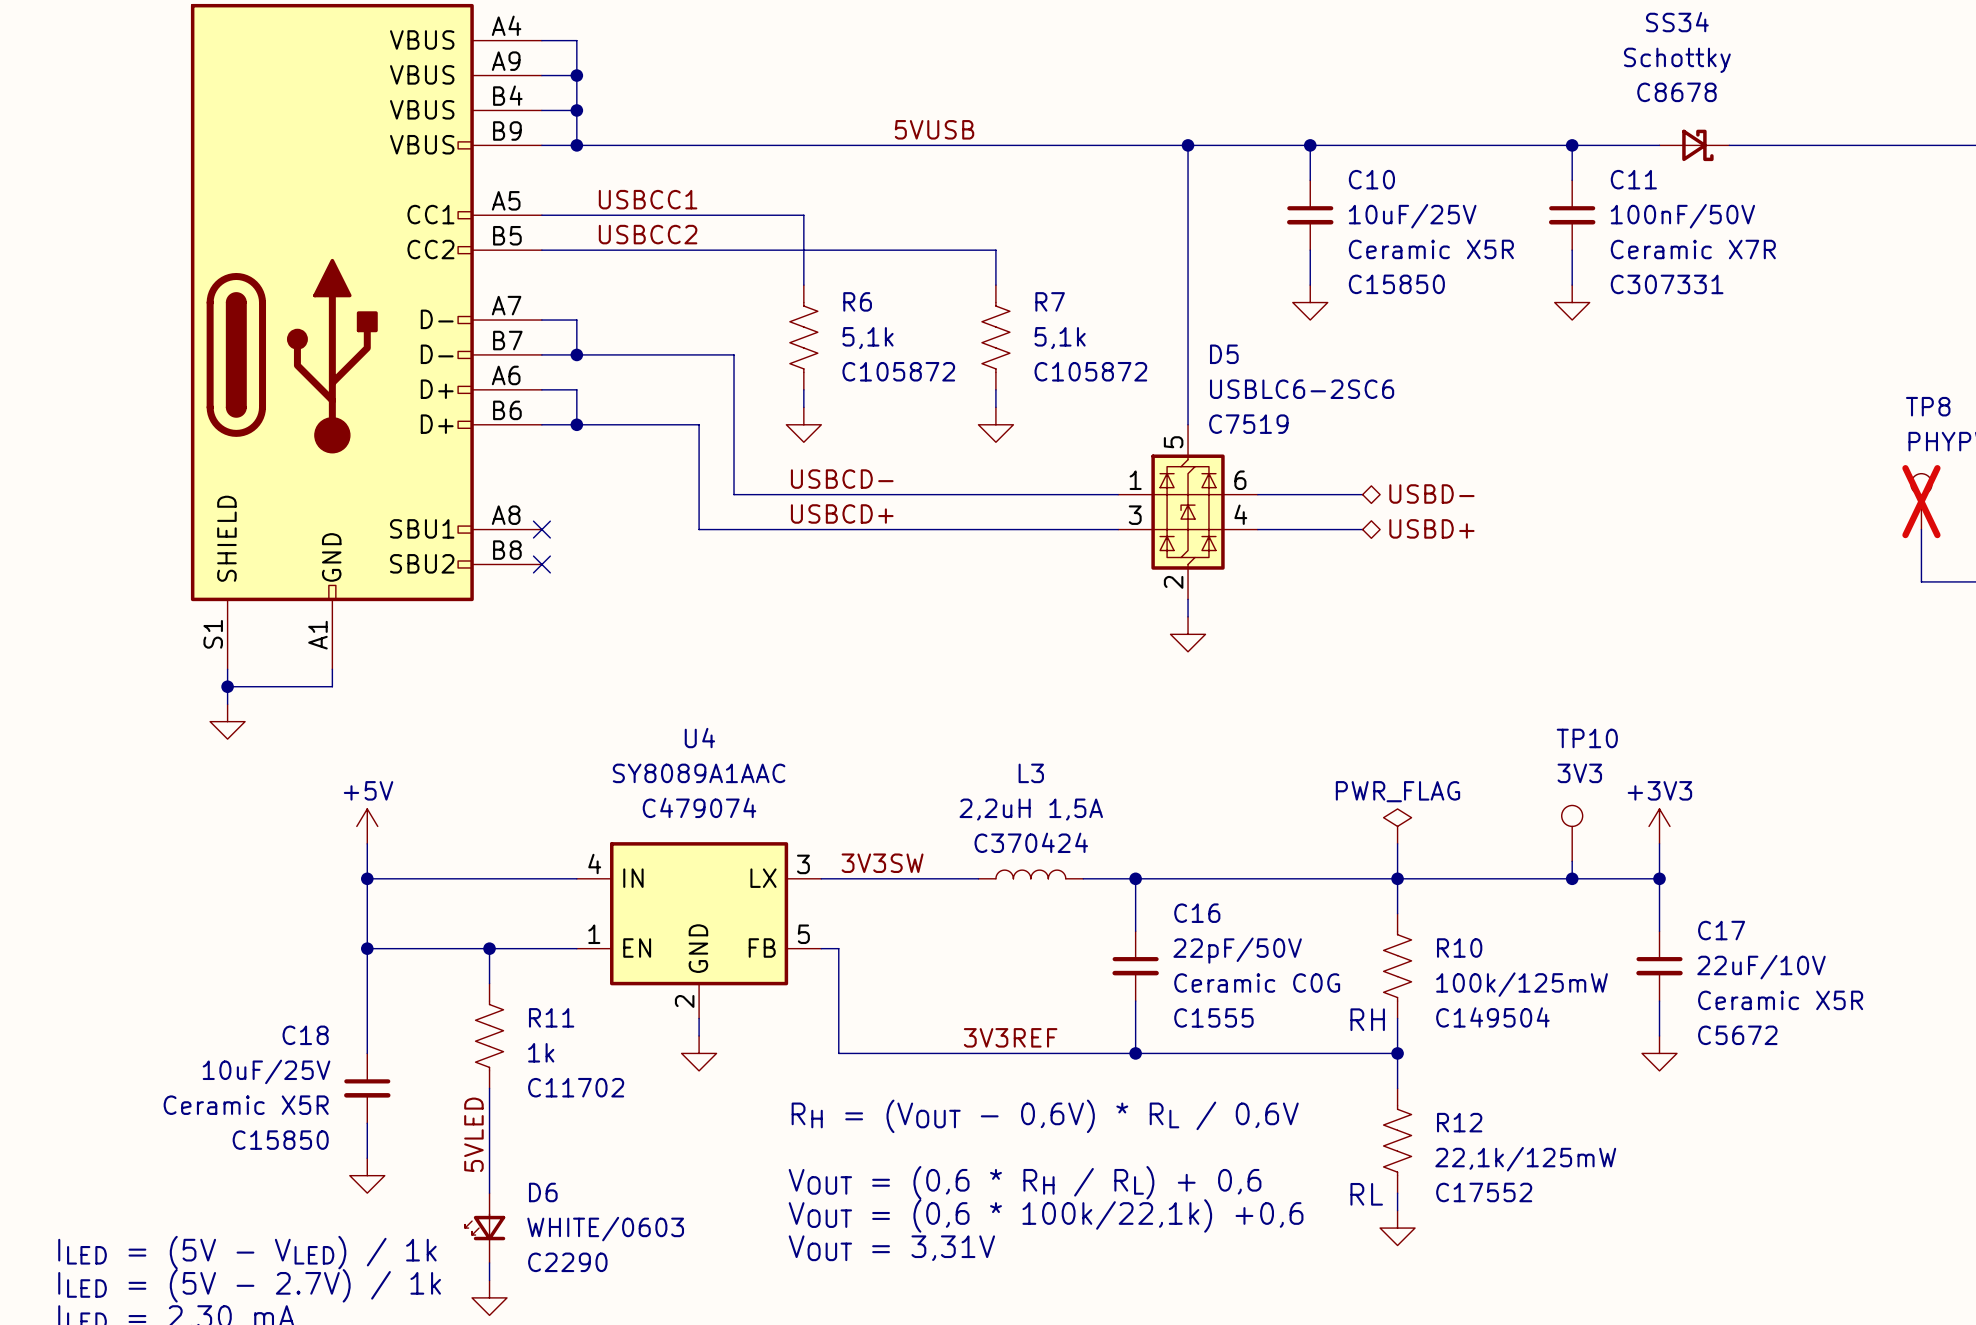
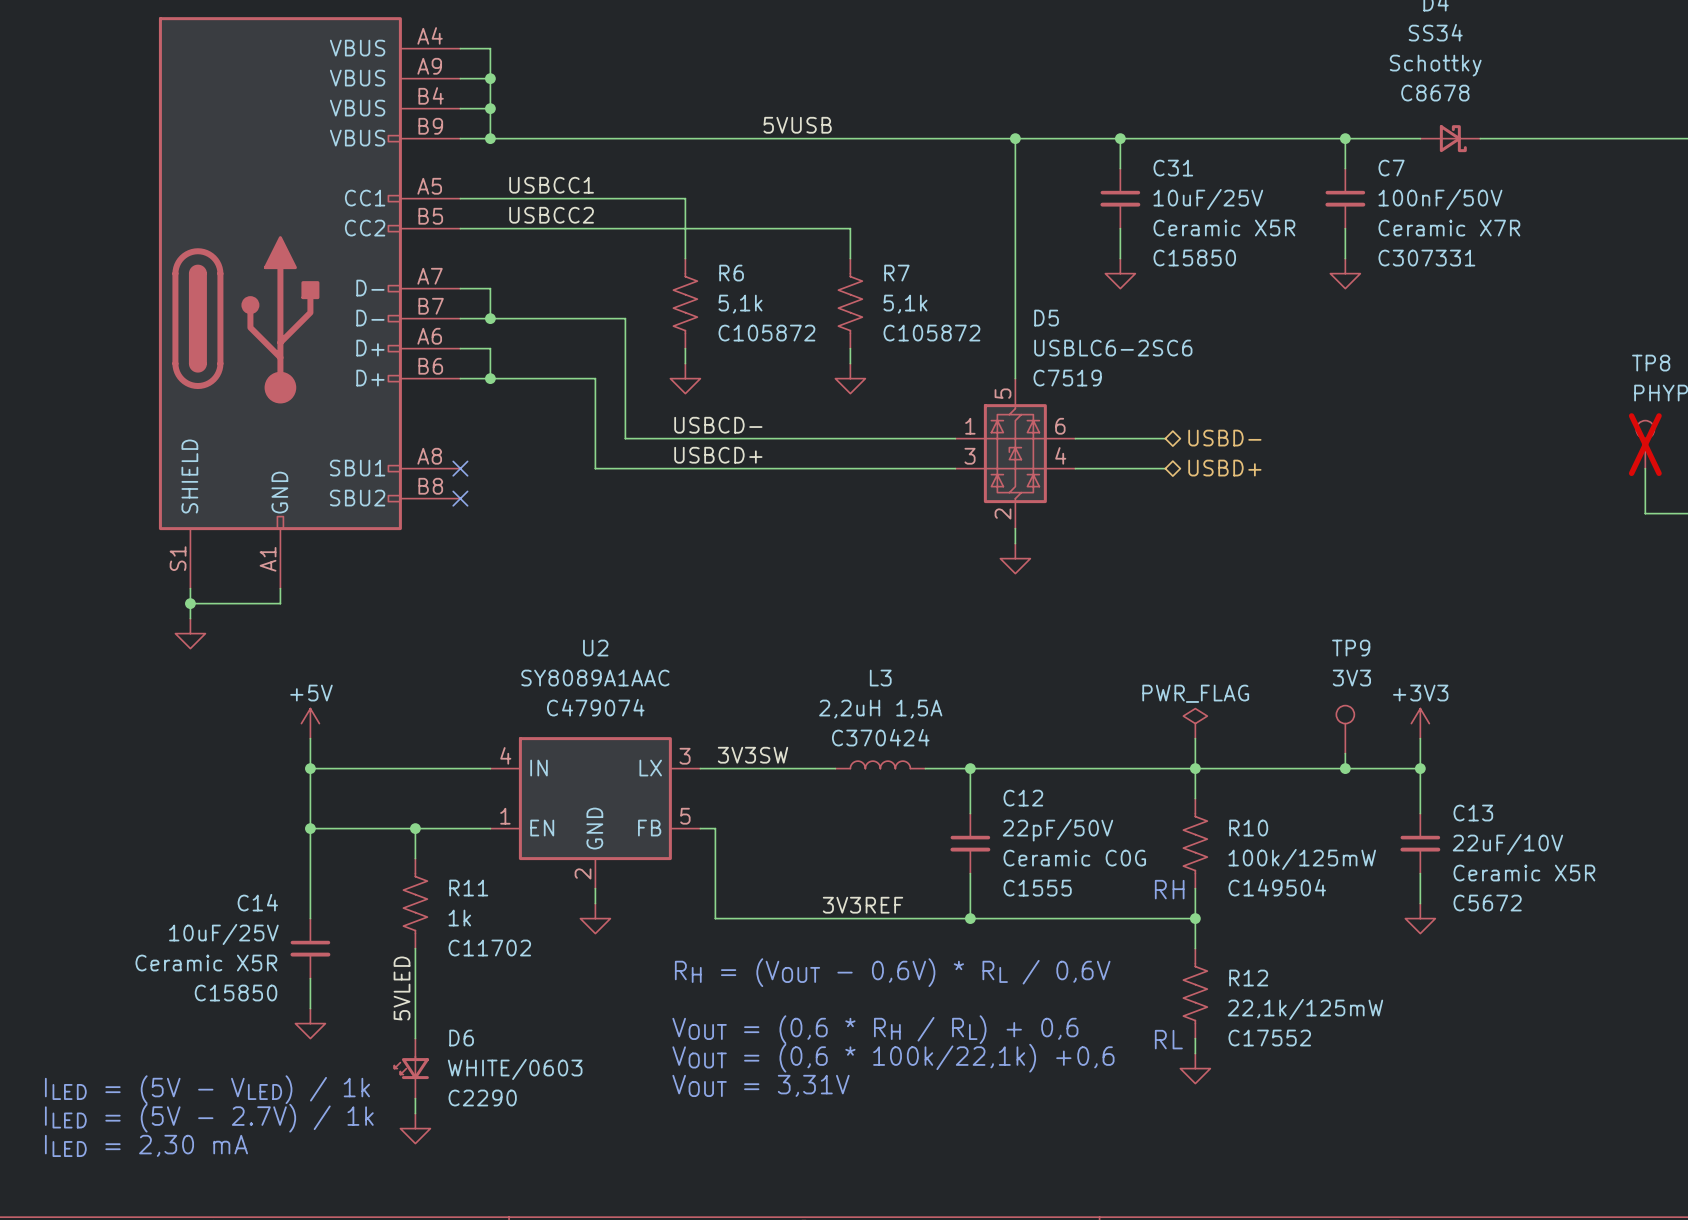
C10 name: C10 (1371, 179) -> C31 (1173, 168)
C11 name: C11 (1633, 179) -> C7 (1391, 168)
U4 name: U4 (699, 738) -> U2 (595, 648)
TP10 name: TP10 (1587, 738) -> TP9 (1351, 648)
C16 name: C16 (1197, 913) -> C12 (1023, 798)
C17 name: C17 (1721, 930) -> C13 (1473, 813)
C18 name: C18 (305, 1035) -> C14 (257, 902)

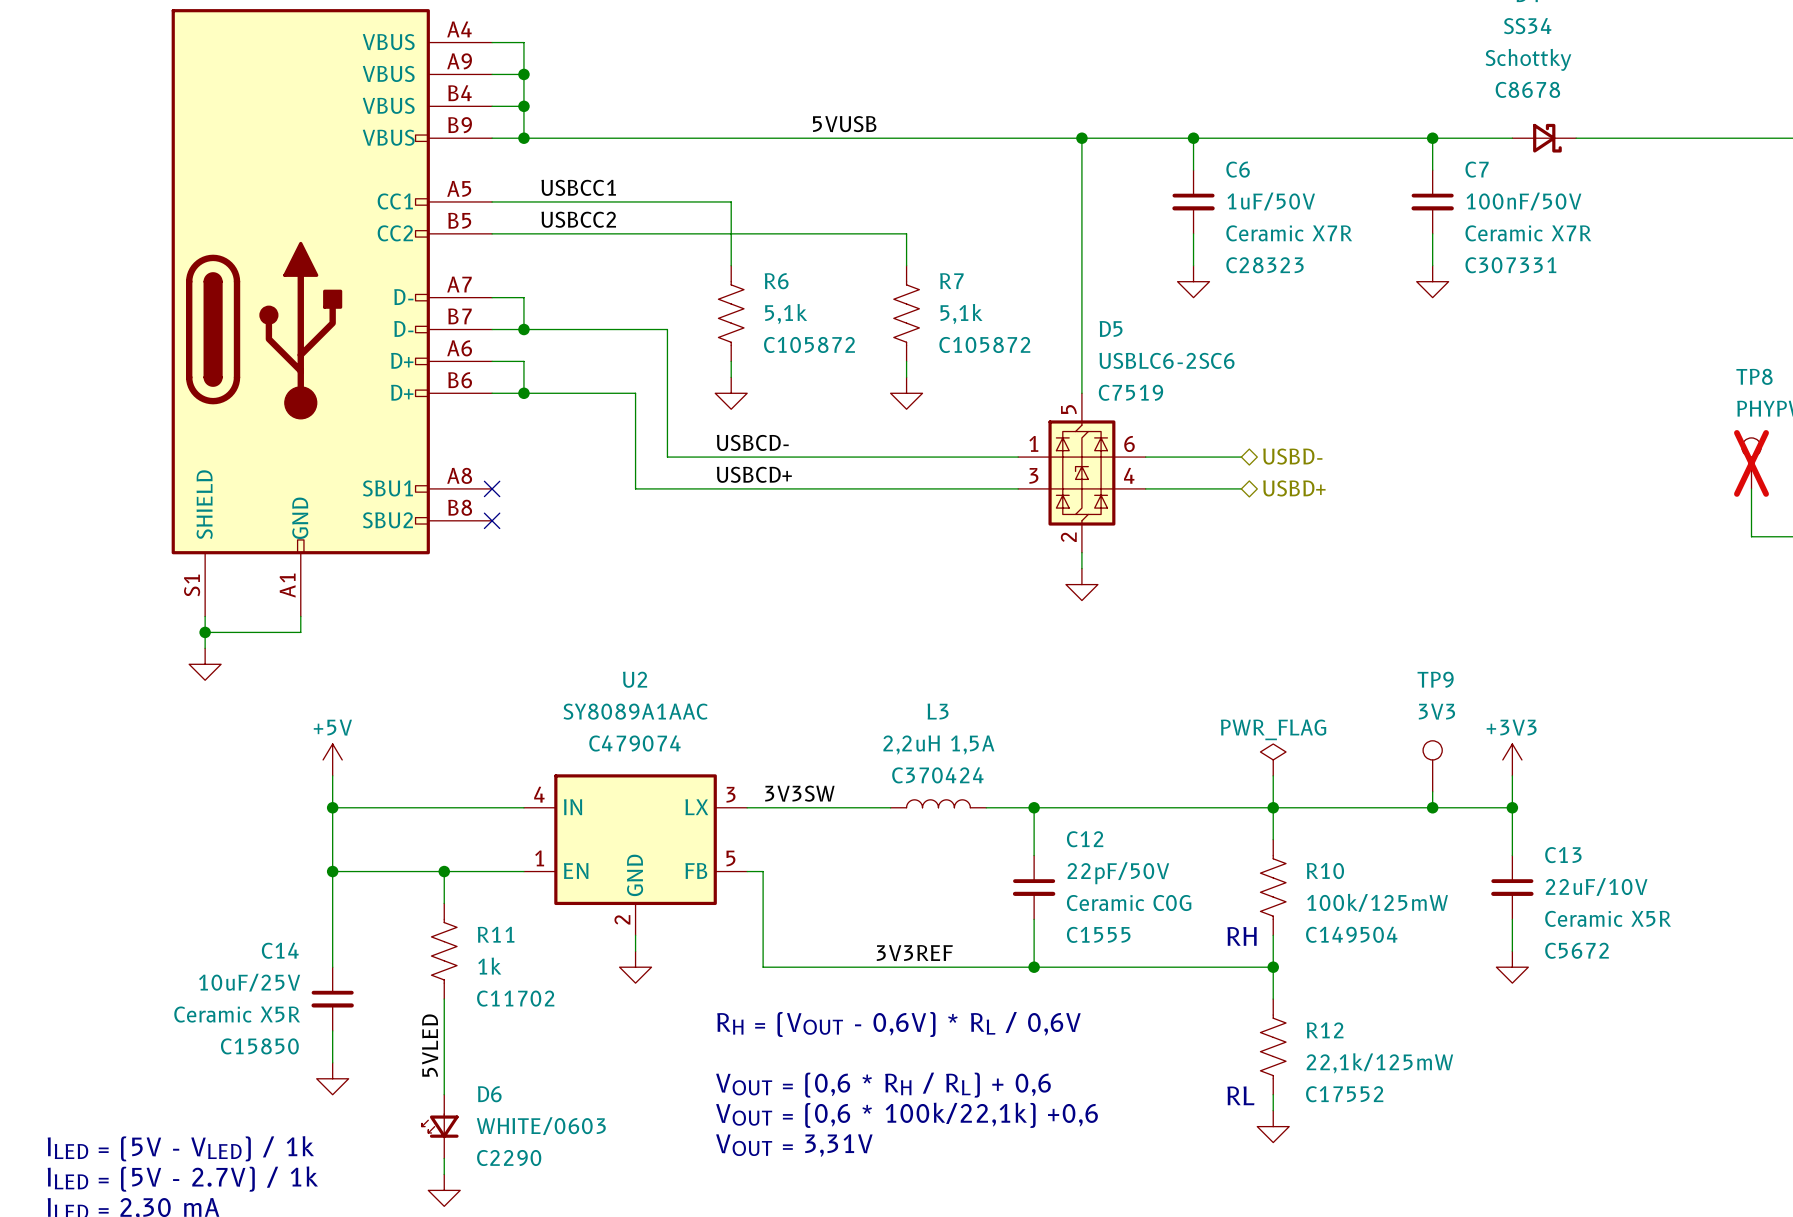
C31 name: C31 (1173, 168) -> C6 (1238, 169)
C31 value: 10uF/25V (1208, 199) -> 1uF/50V (1271, 201)
C31 text: Ceramic X5R (1224, 228) -> Ceramic X7R (1289, 233)
C31 text: C15850 (1194, 257) -> C28323 (1264, 265)

